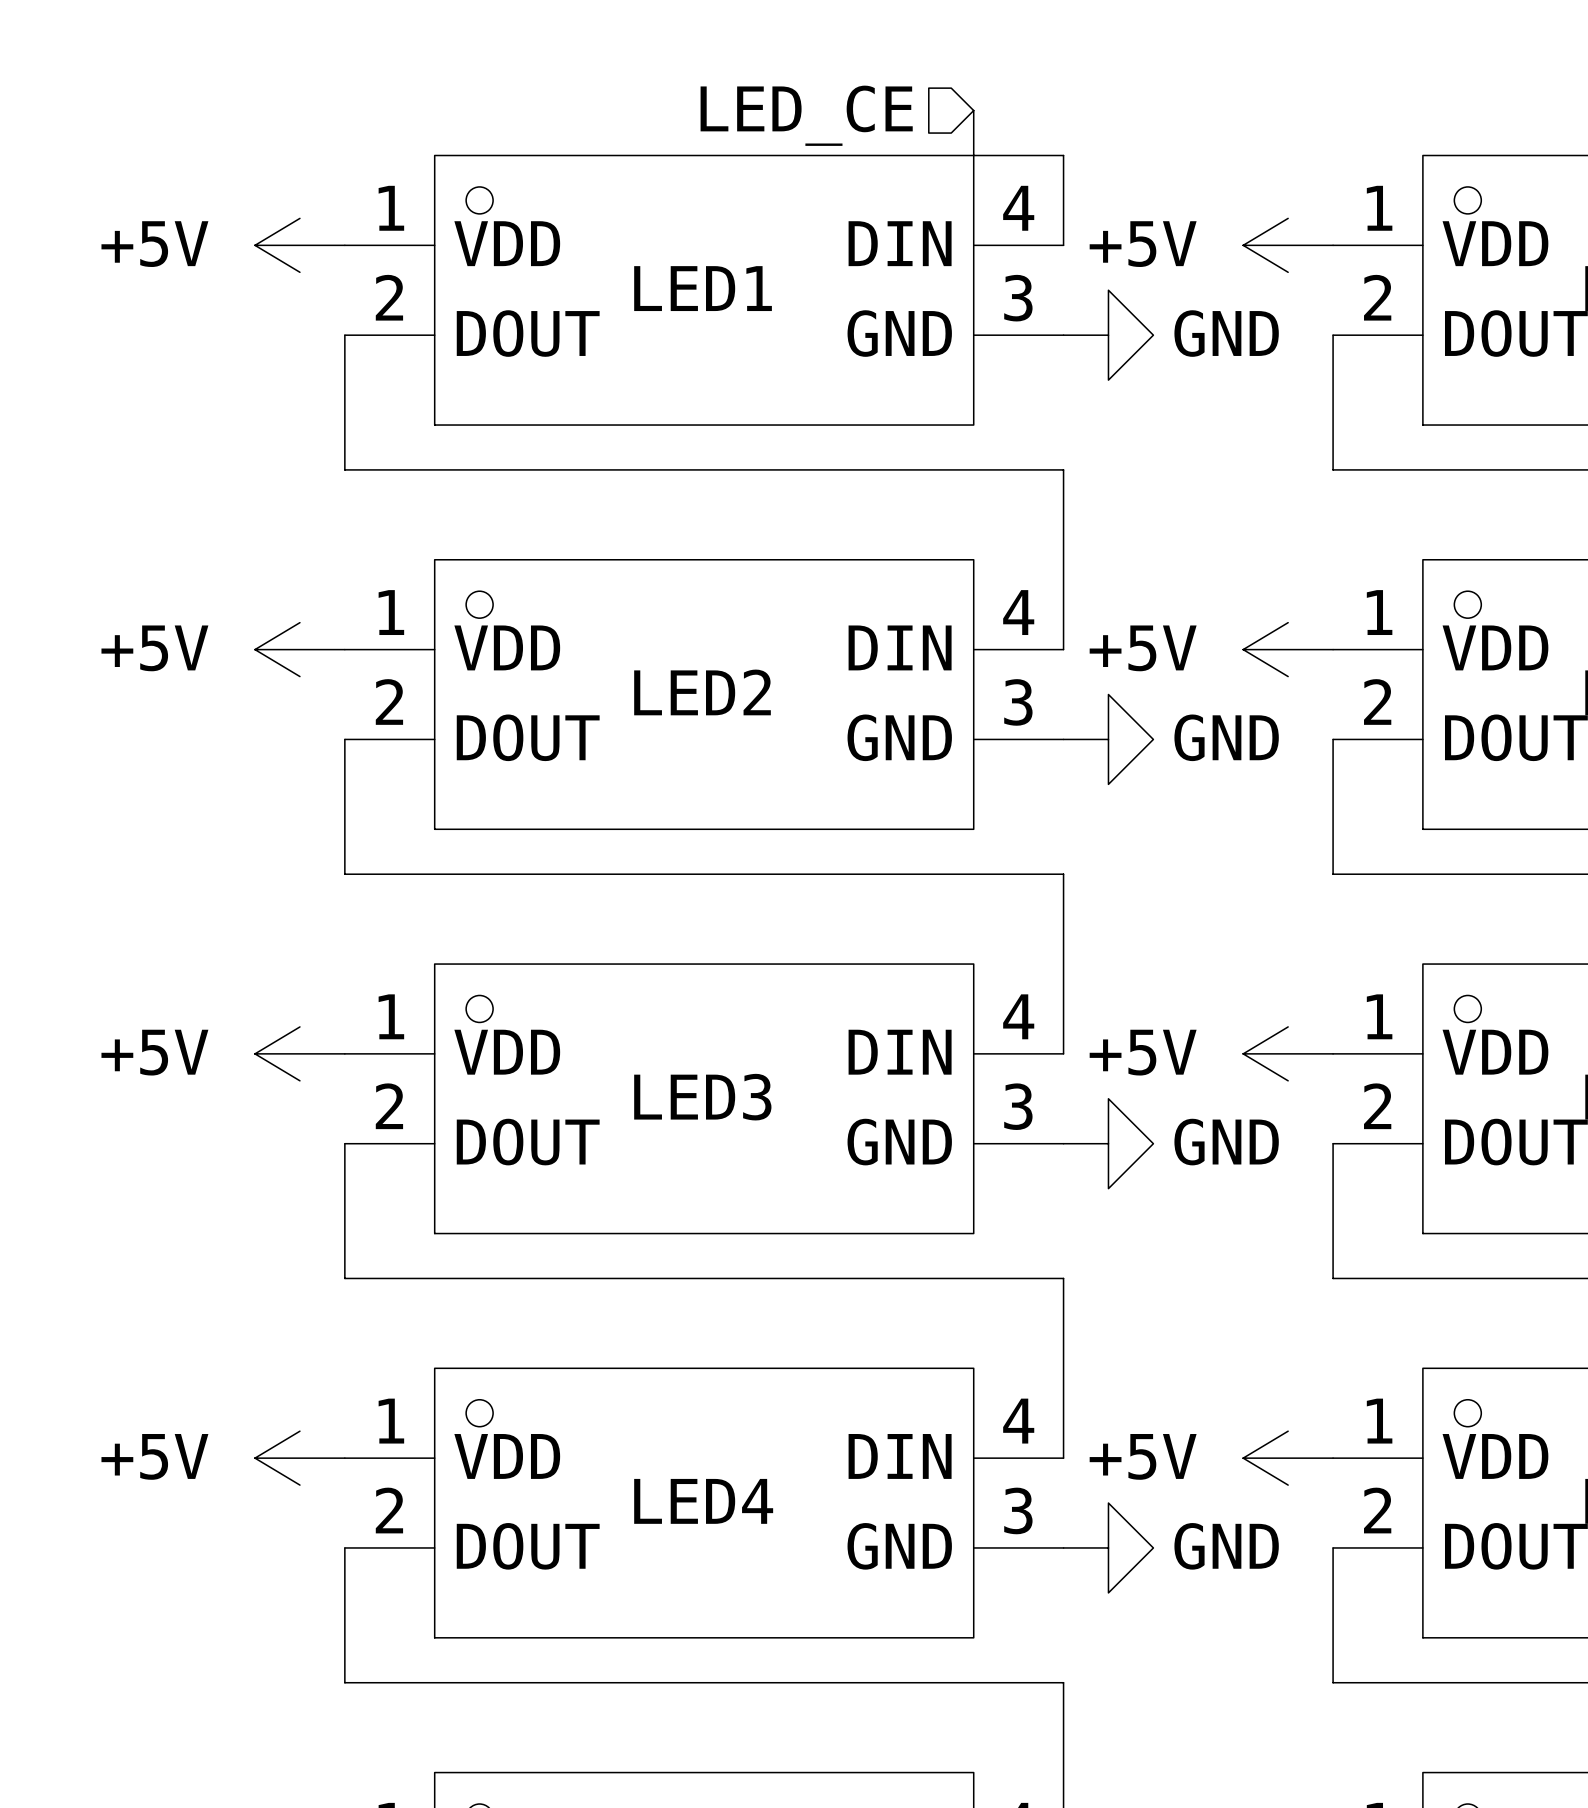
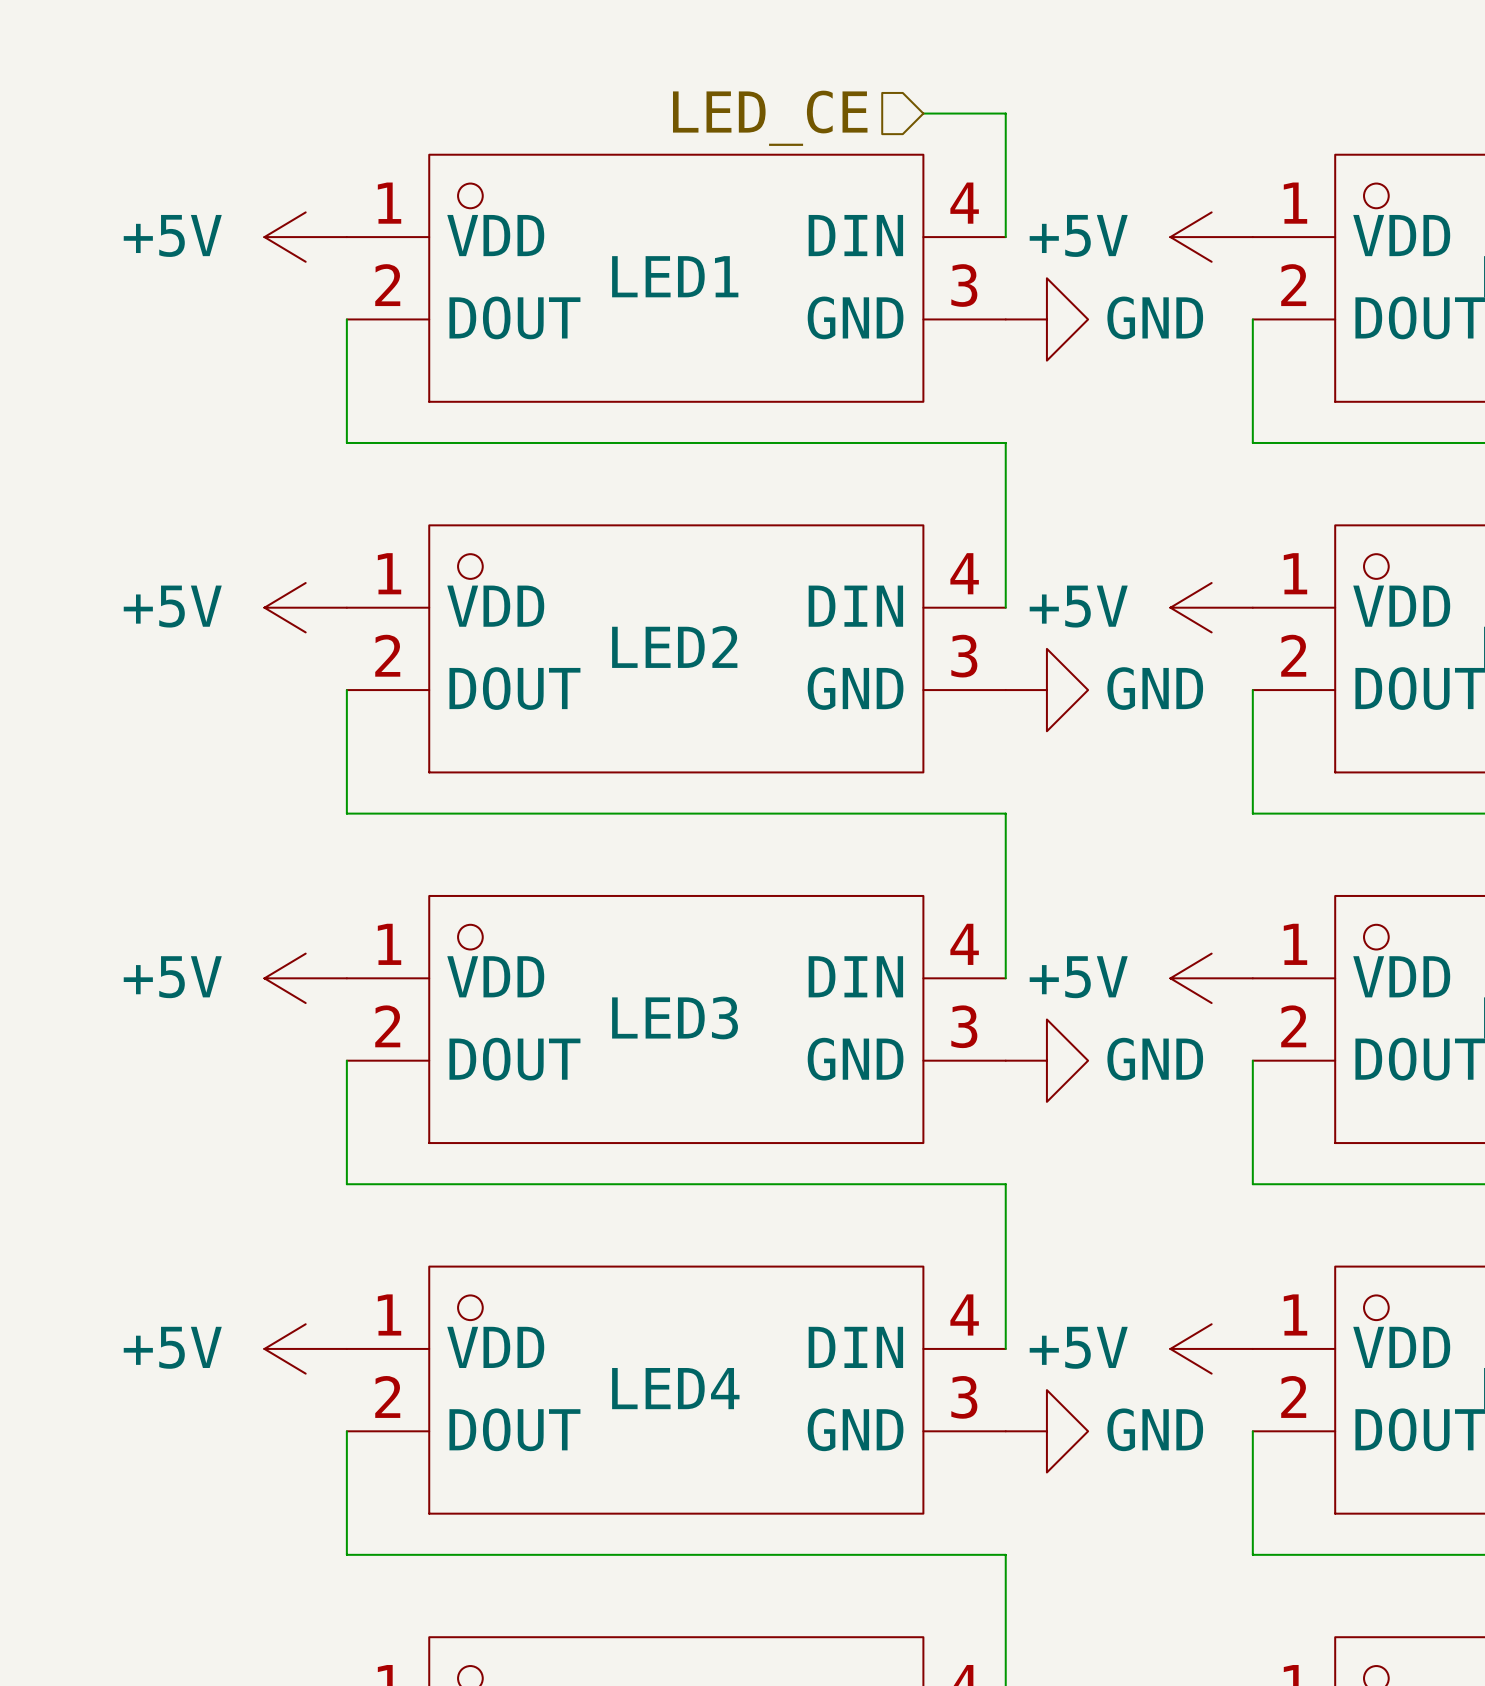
wire: (973, 110) (973, 155) (1063, 155) -> (923, 113) (1005, 113) (1005, 154)

